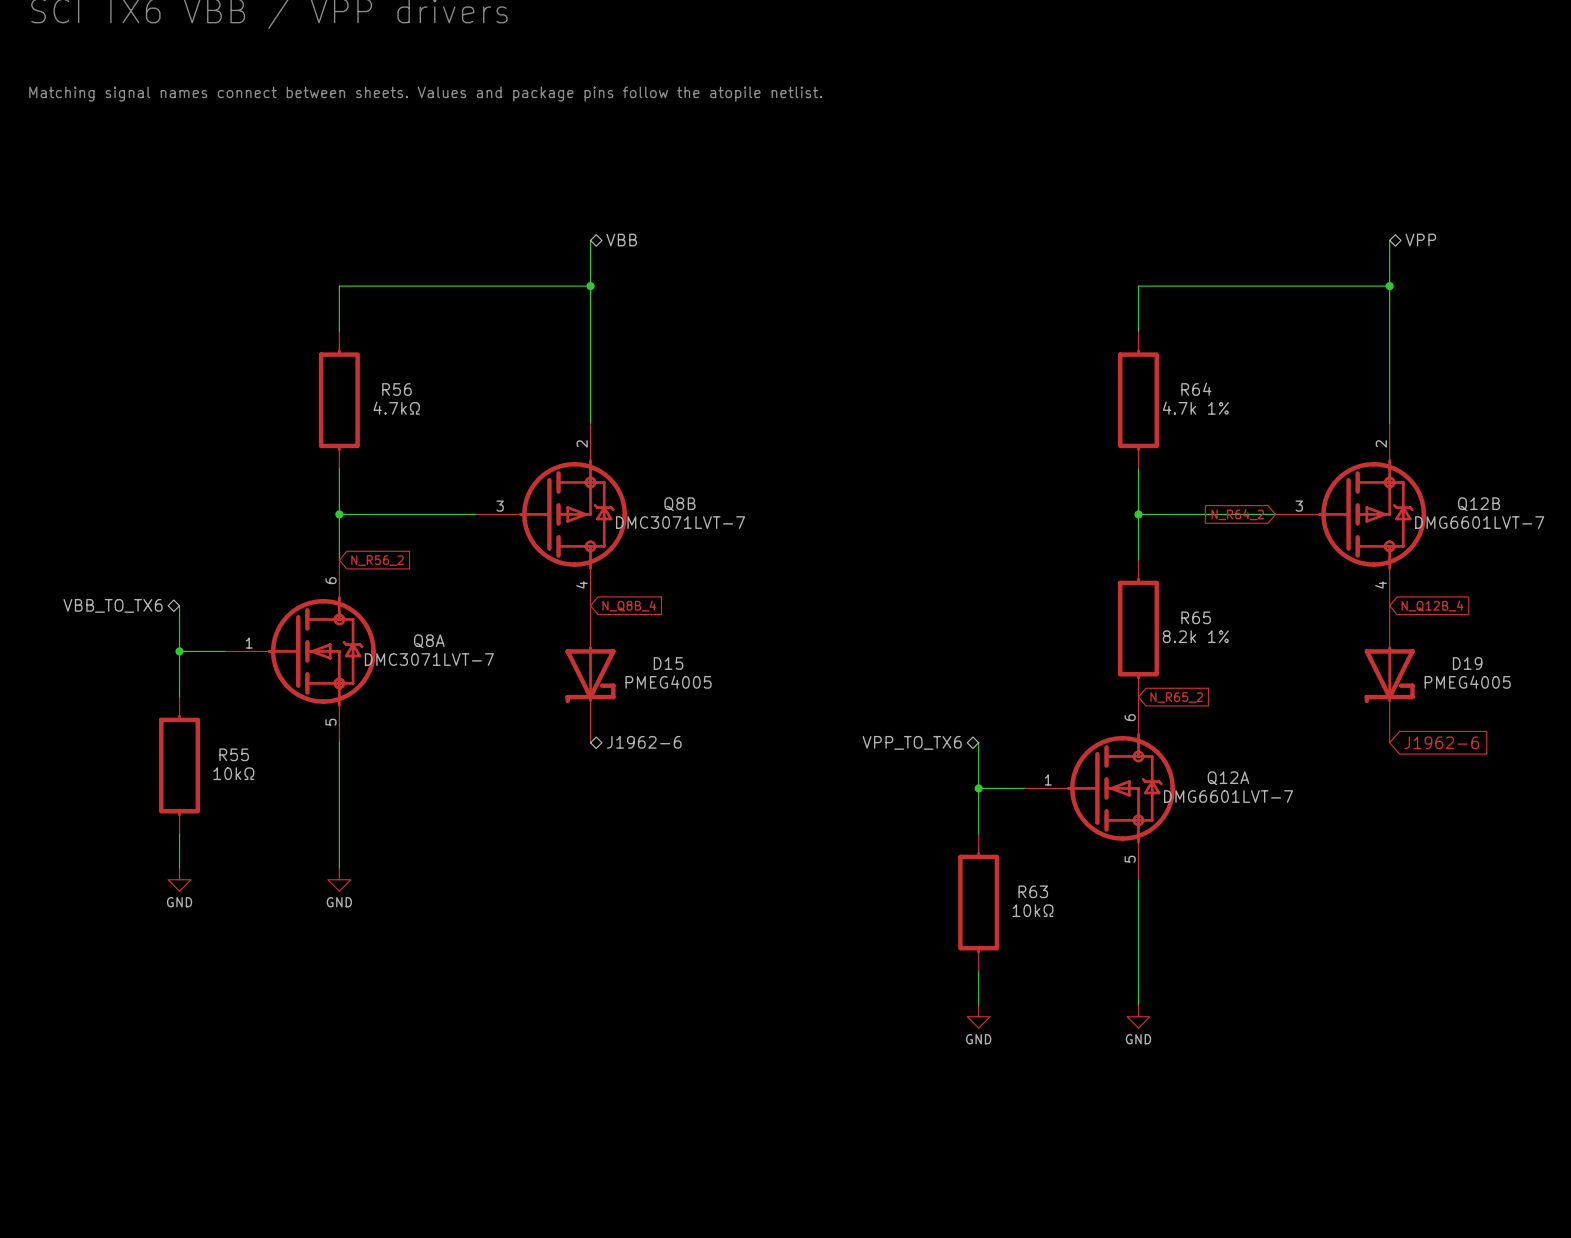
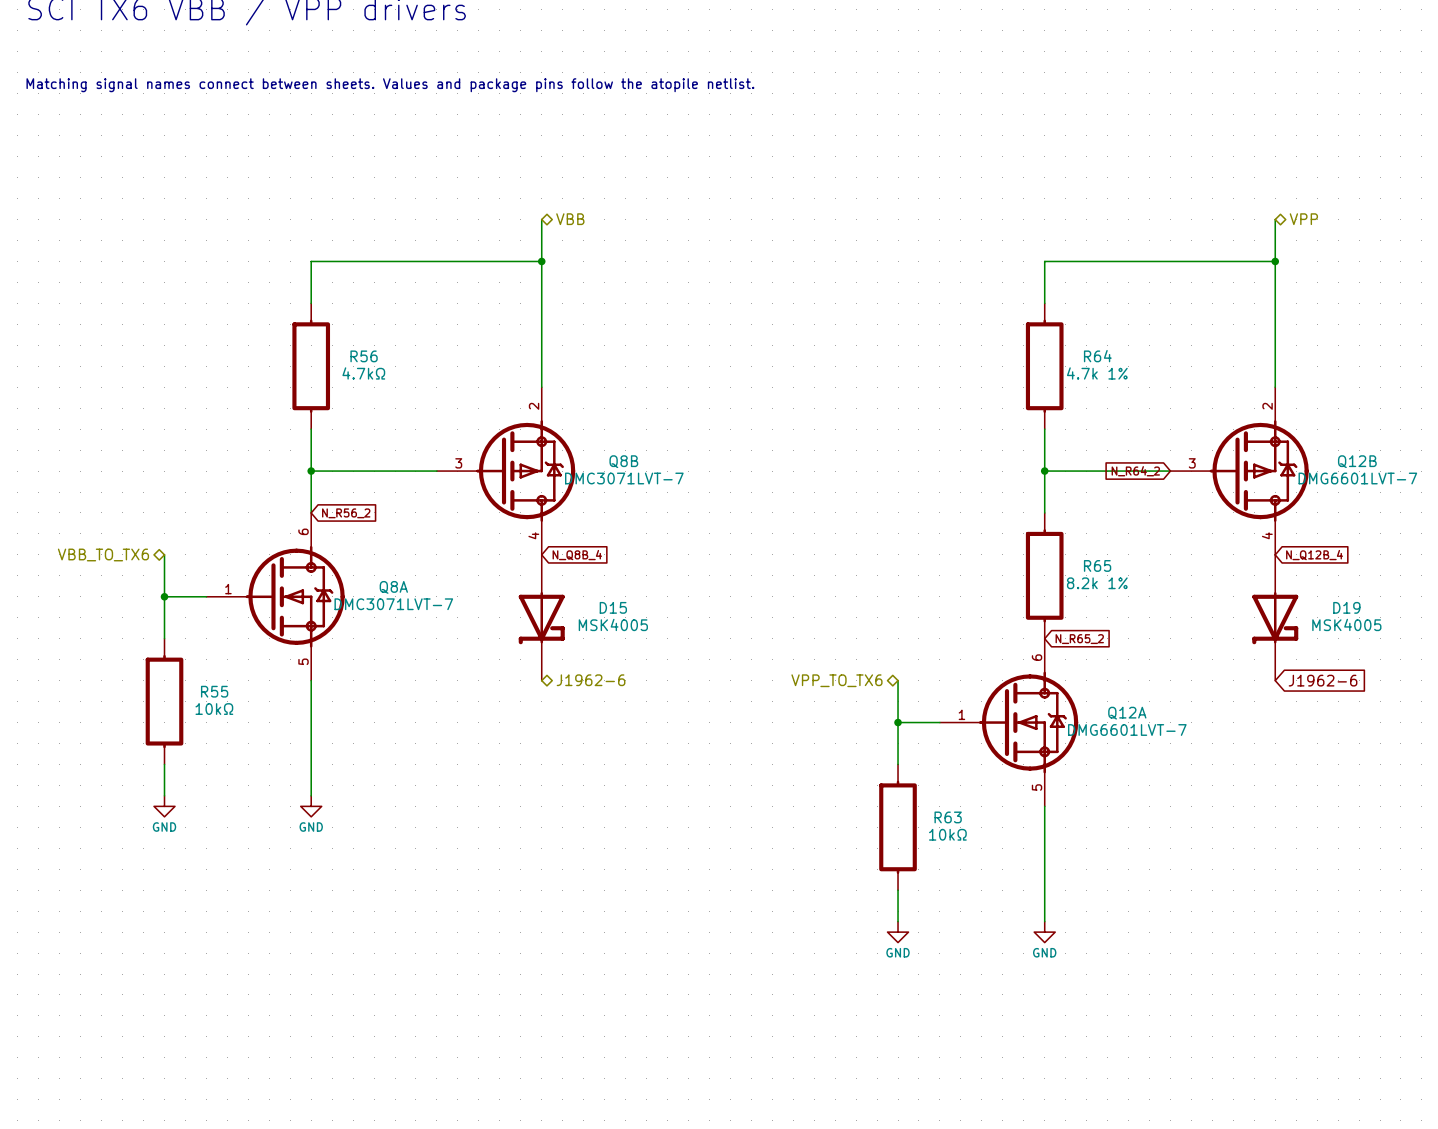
D15 value: PMEG4005 (668, 682) -> MSK4005 (613, 624)
D19 value: PMEG4005 (1467, 682) -> MSK4005 (1346, 624)

